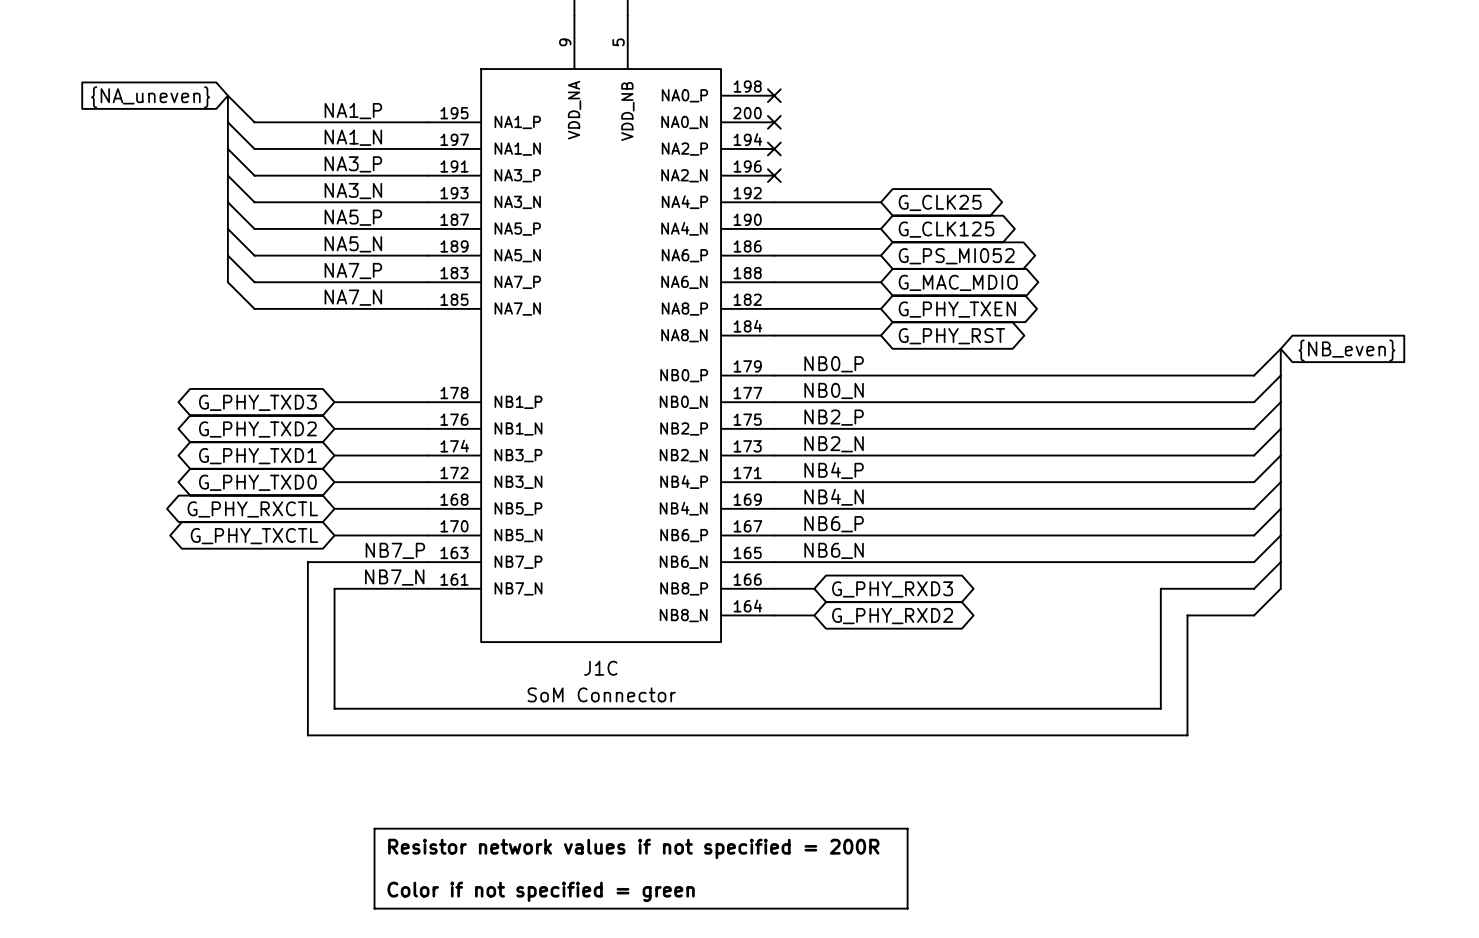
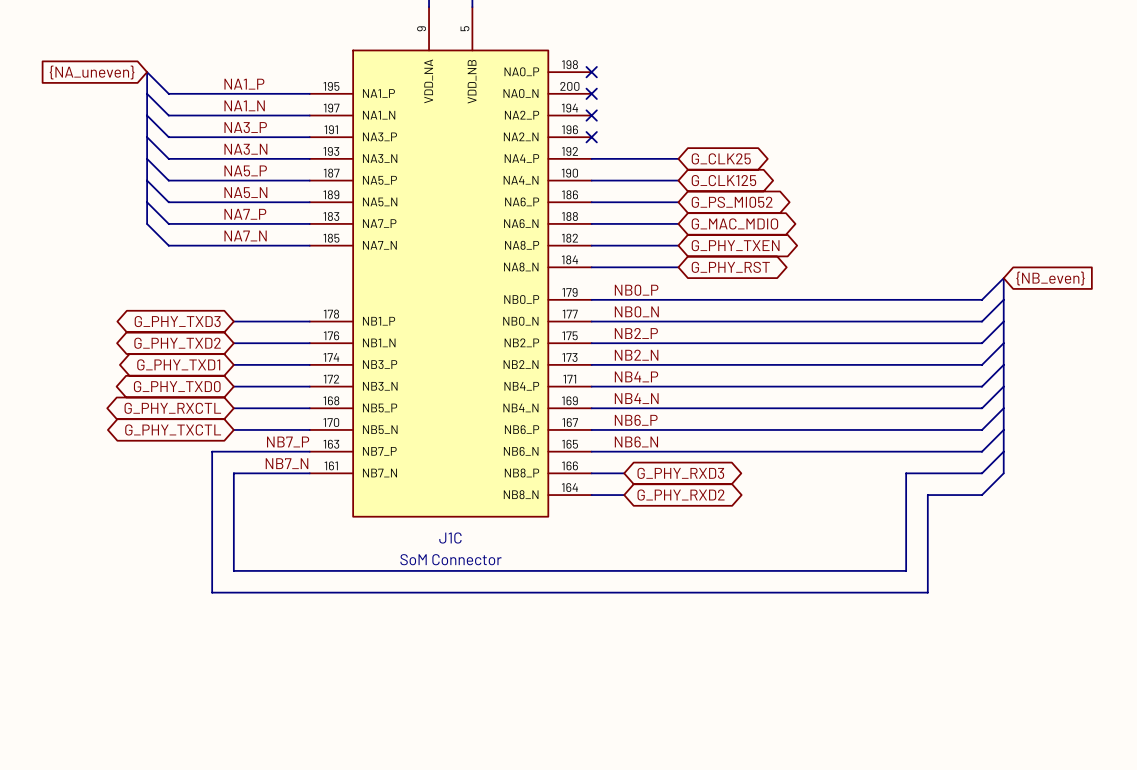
line: (374, 828) (907, 828) (907, 908) (374, 908) (374, 828) -> none
text: Resistor network values if not specified = 200R (633, 848) -> none
text: Color if not specified = green (541, 891) -> none

